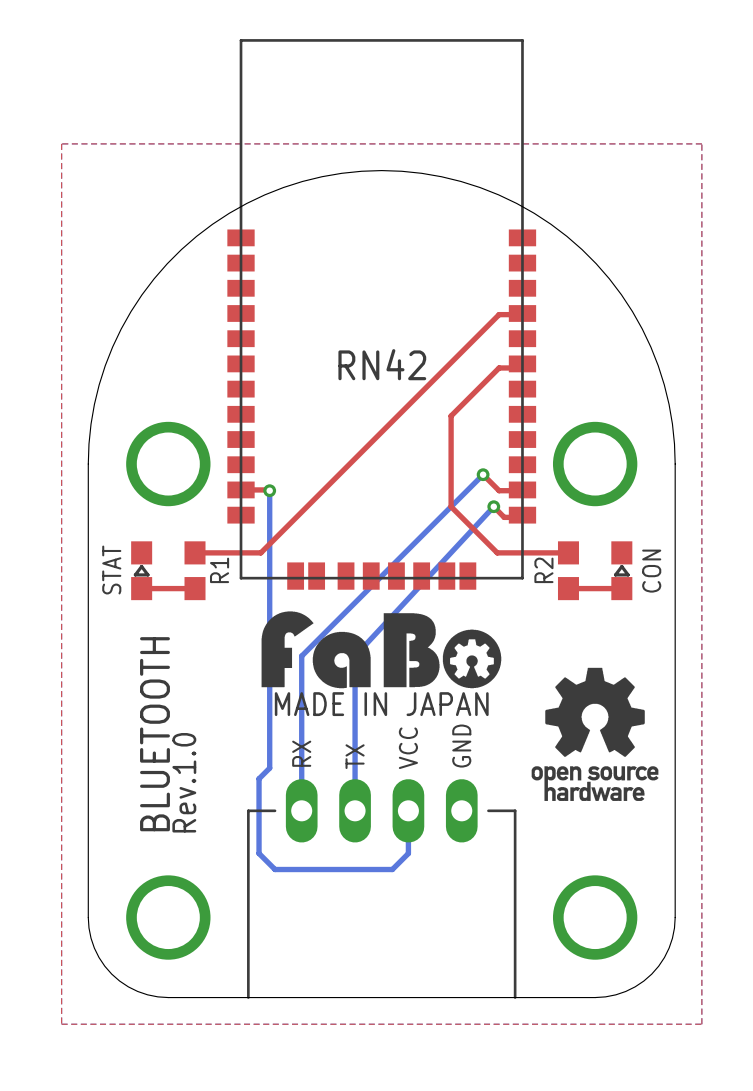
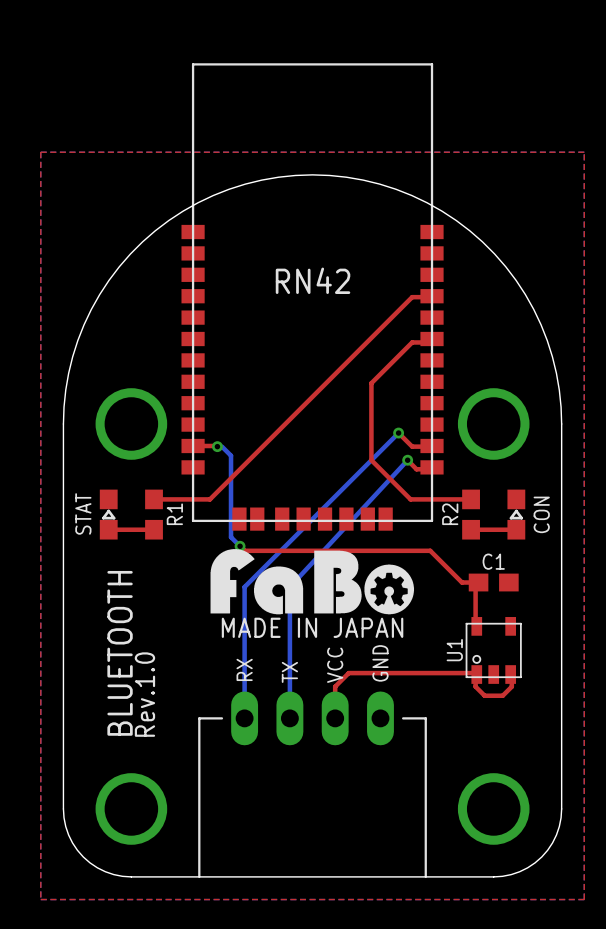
text position: RN42 (382, 364) -> RN42 (313, 280)
bottom track: (269, 490) (269, 768) (259, 778) (259, 853) (275, 869) (392, 869) (408, 853) (408, 810) -> none
bottom track: none -> (221, 446) (231, 455) (231, 537) (240, 546)
top track: none -> (240, 546) (244, 550) (430, 550) (462, 582) (475, 582) (476, 626)
via: none -> (240, 546)
C1: none -> (493, 582)
drawing: [531, 667, 659, 801] -> none
U1: none -> (493, 650)
top track: none -> (510, 674) (511, 686) (502, 695) (484, 695) (475, 686) (475, 673) (348, 673) (335, 686) (335, 718)

